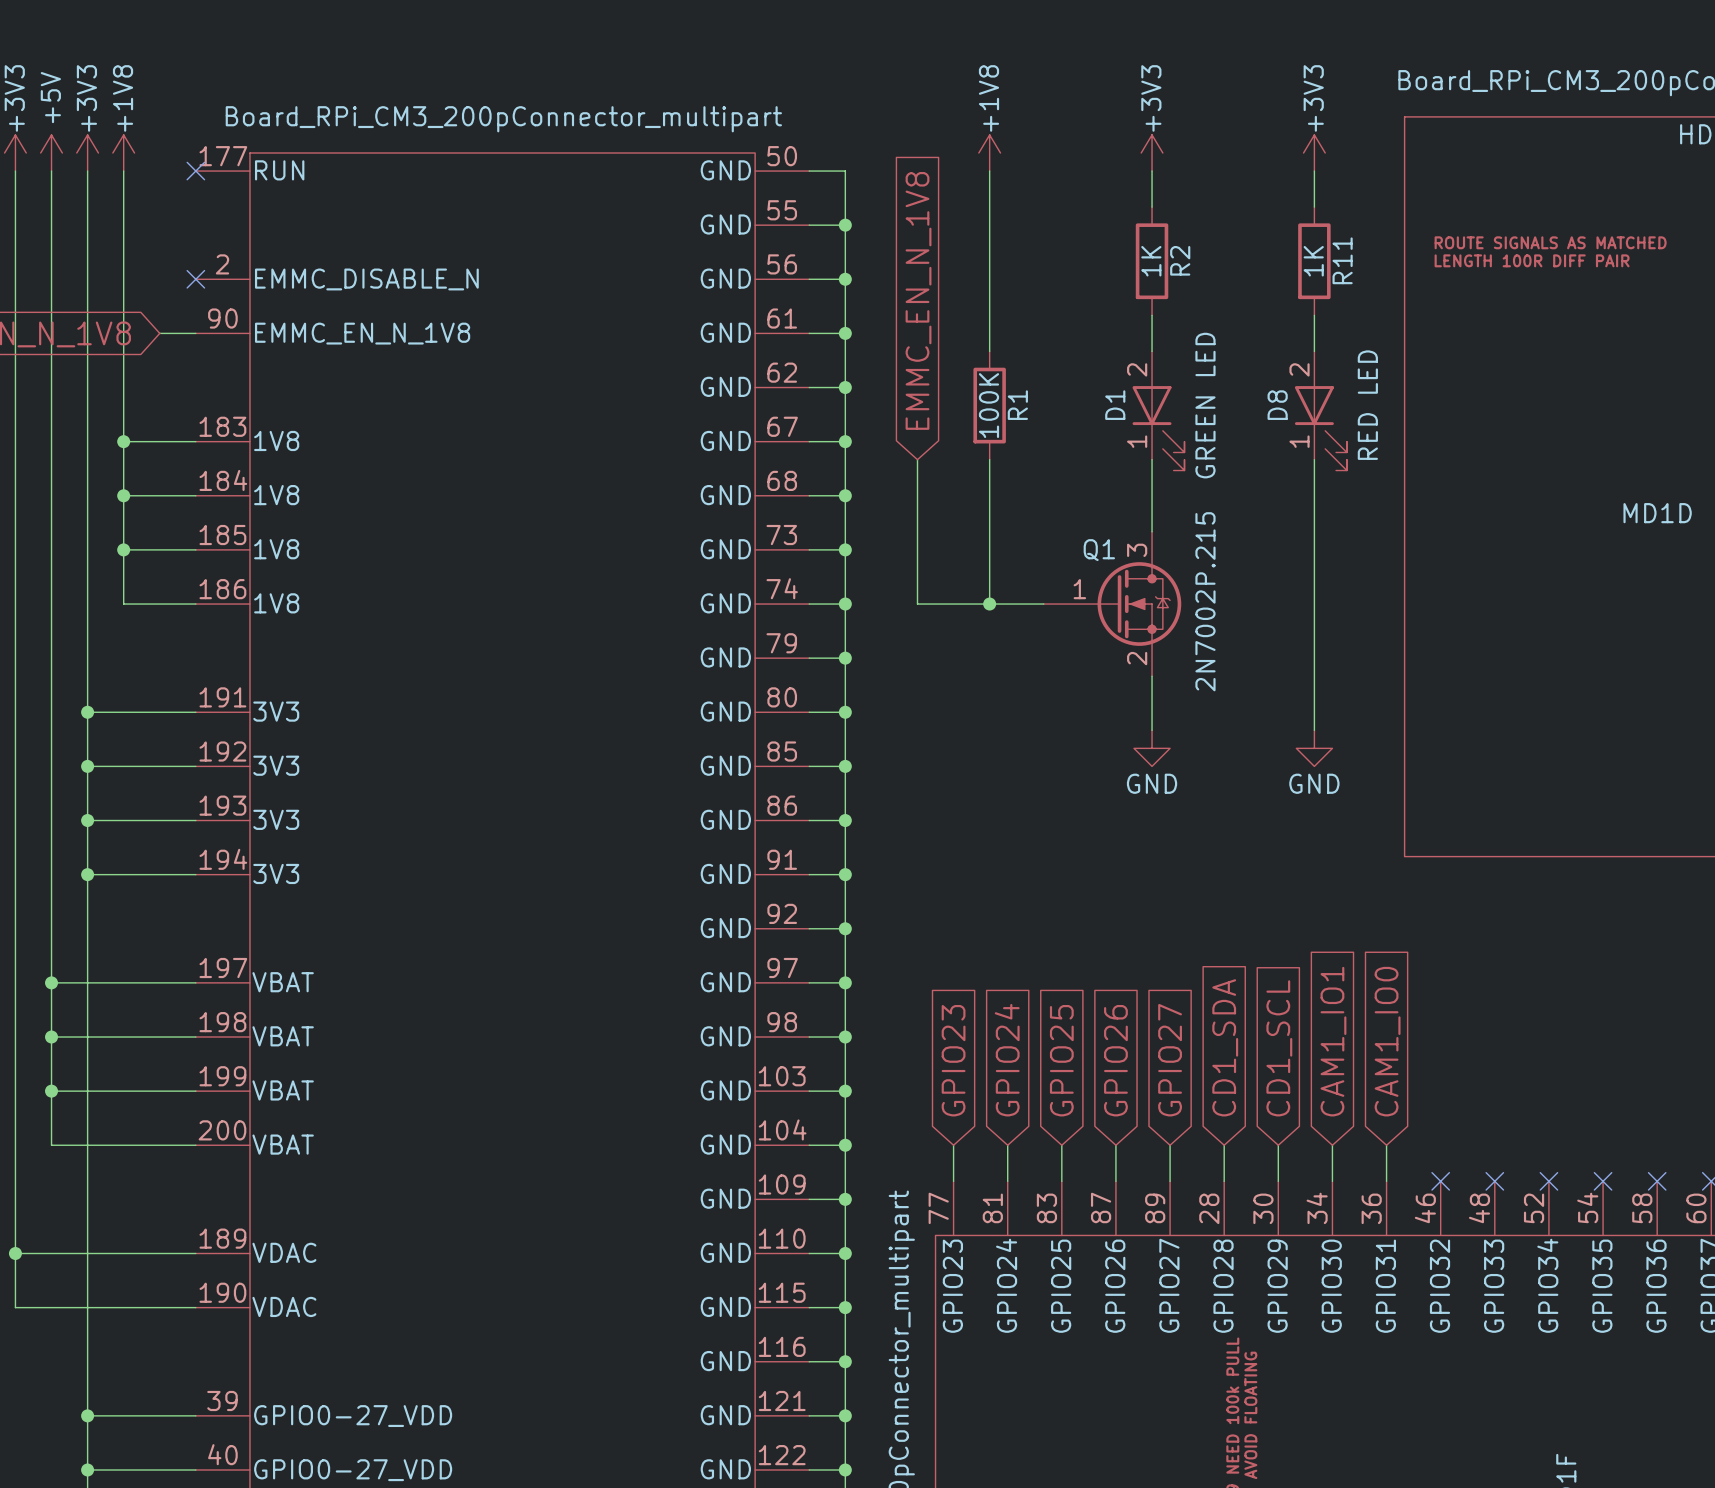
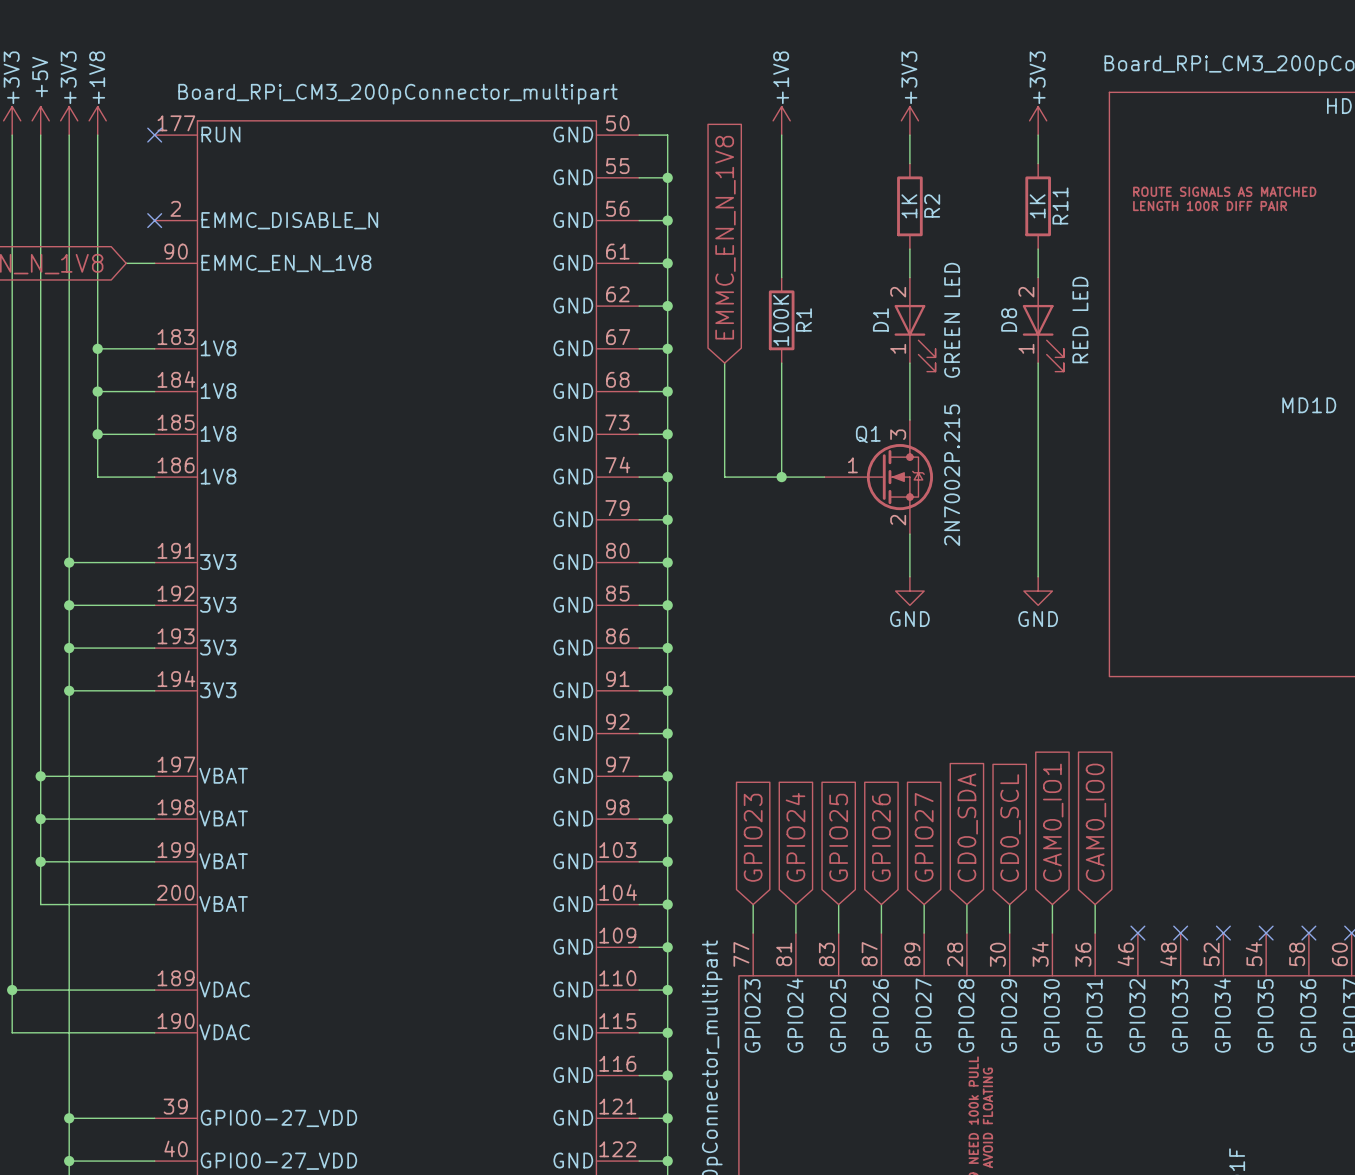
global label: CAM1_IO1 (1333, 1041) -> CAM0_IO1 (1053, 822)
global label: CAM1_IO0 (1387, 1041) -> CAM0_IO0 (1095, 822)
global label: CD1_SDA (1225, 1047) -> CD0_SDA (967, 827)
global label: CD1_SCL (1279, 1048) -> CD0_SCL (1010, 828)

